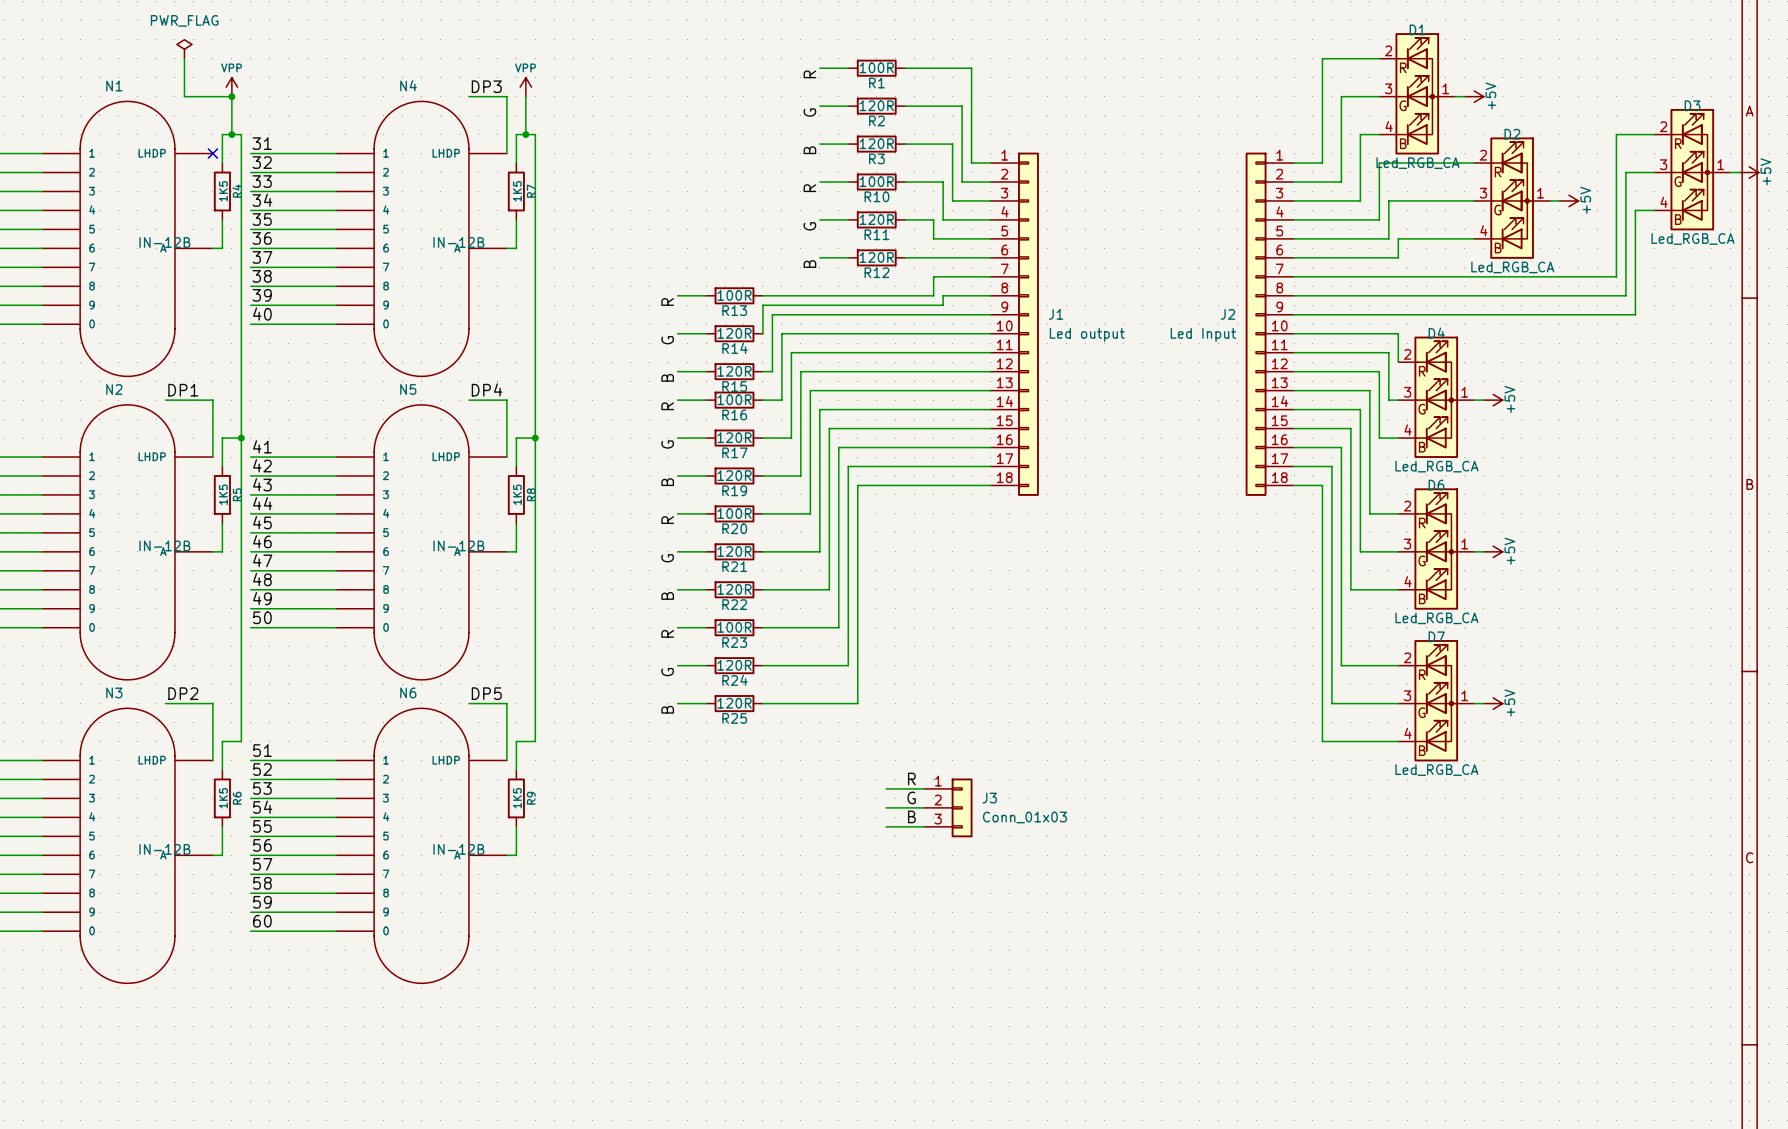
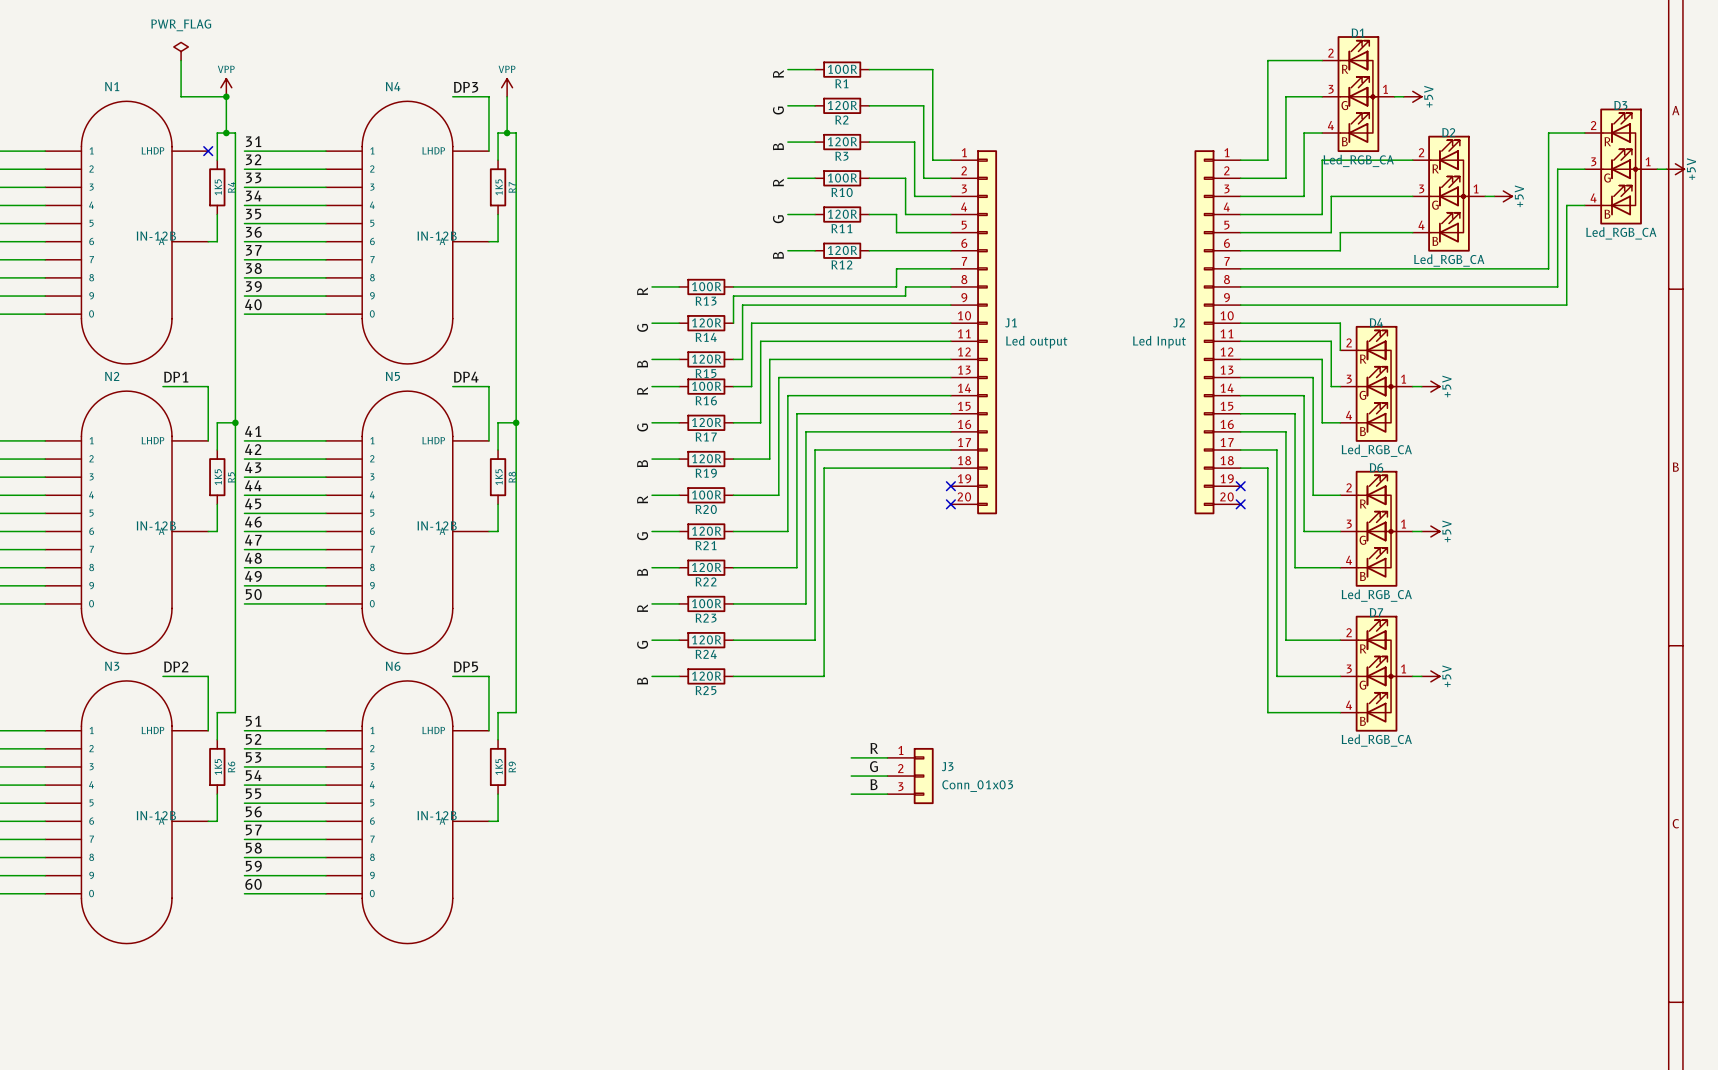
J1 symbol: [990, 152, 1039, 496] -> [950, 150, 998, 515]
J2 symbol: [1245, 152, 1295, 496] -> [1194, 150, 1241, 515]
no-connect mark: none -> (950, 486)
no-connect mark: none -> (1240, 486)
no-connect mark: none -> (950, 504)
no-connect mark: none -> (1240, 504)

